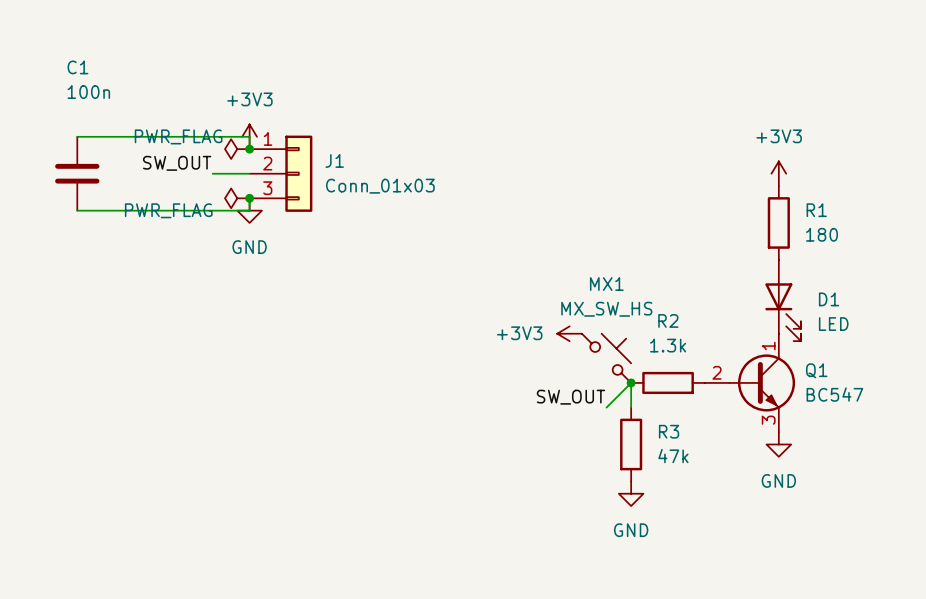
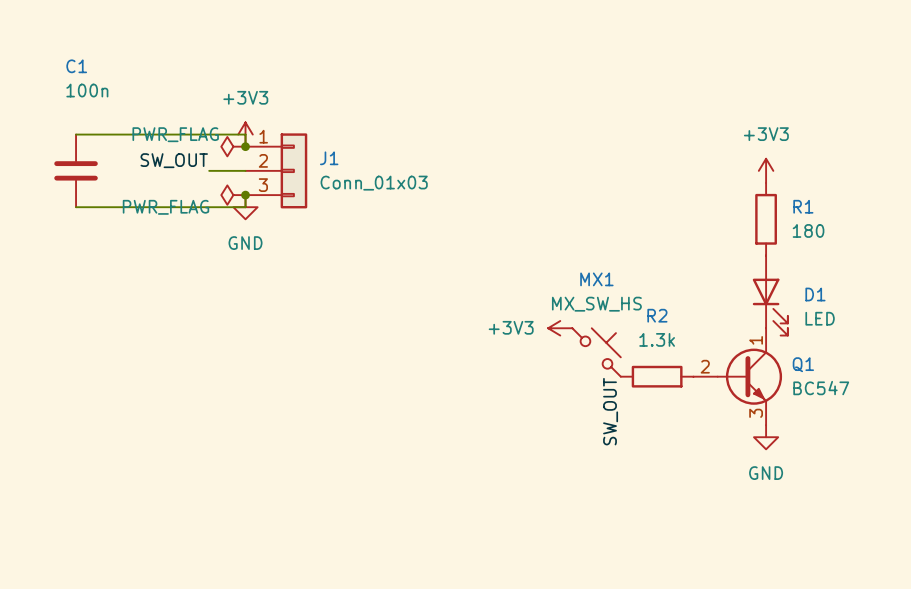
junction: (631, 382) -> none
label rotation: 0° (570, 397) -> 90° counterclockwise (610, 411)
wire: (606, 407) (631, 382) (631, 407) -> none
R3: 47k (631, 444) -> none
power symbol: GND (631, 493) -> none

